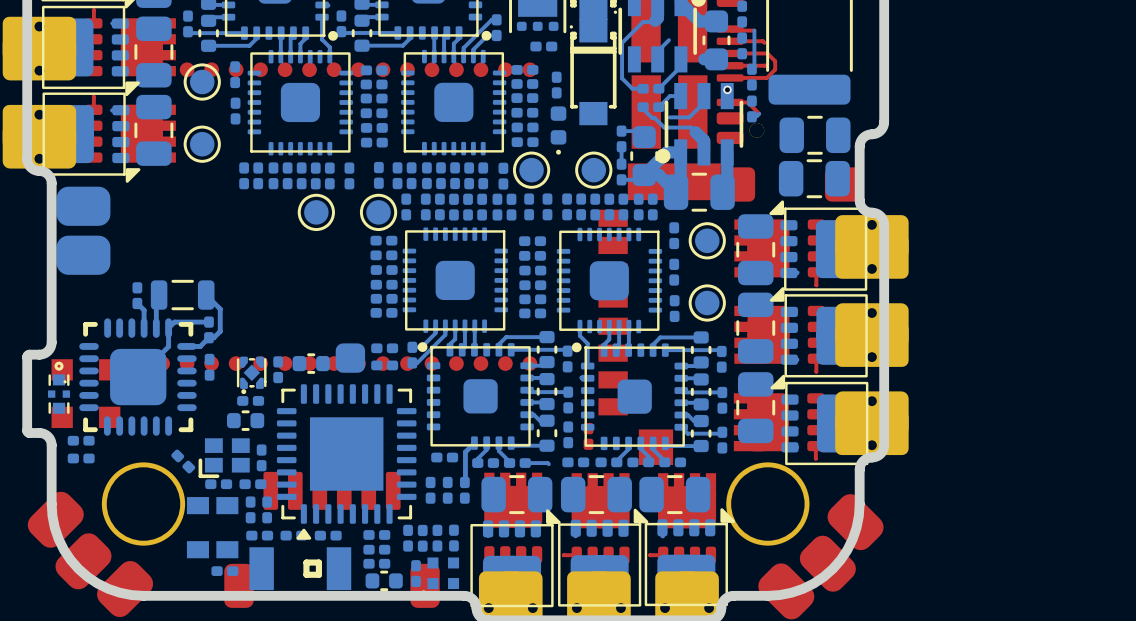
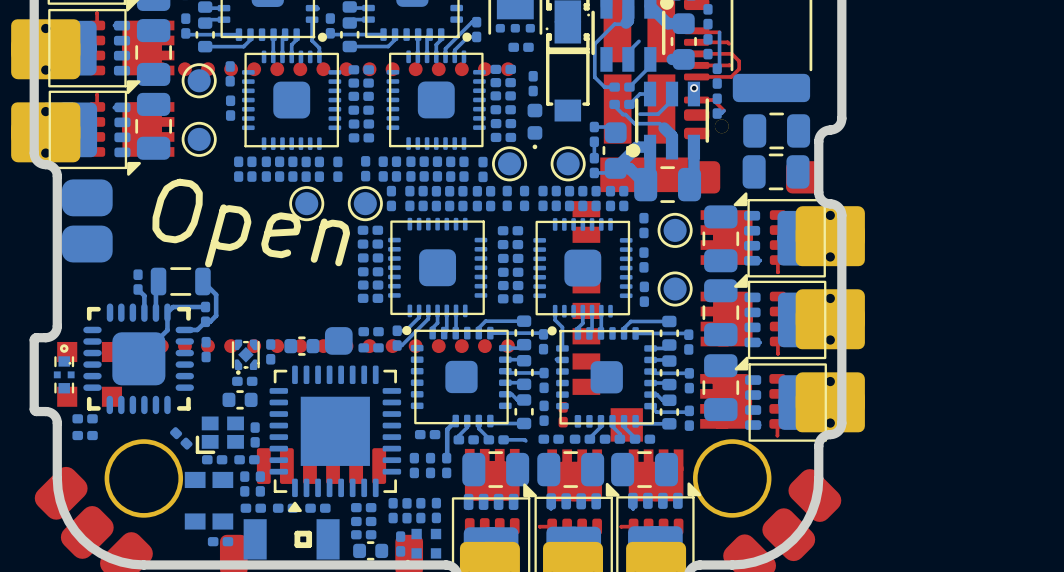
text: none -> Open (251, 223)

